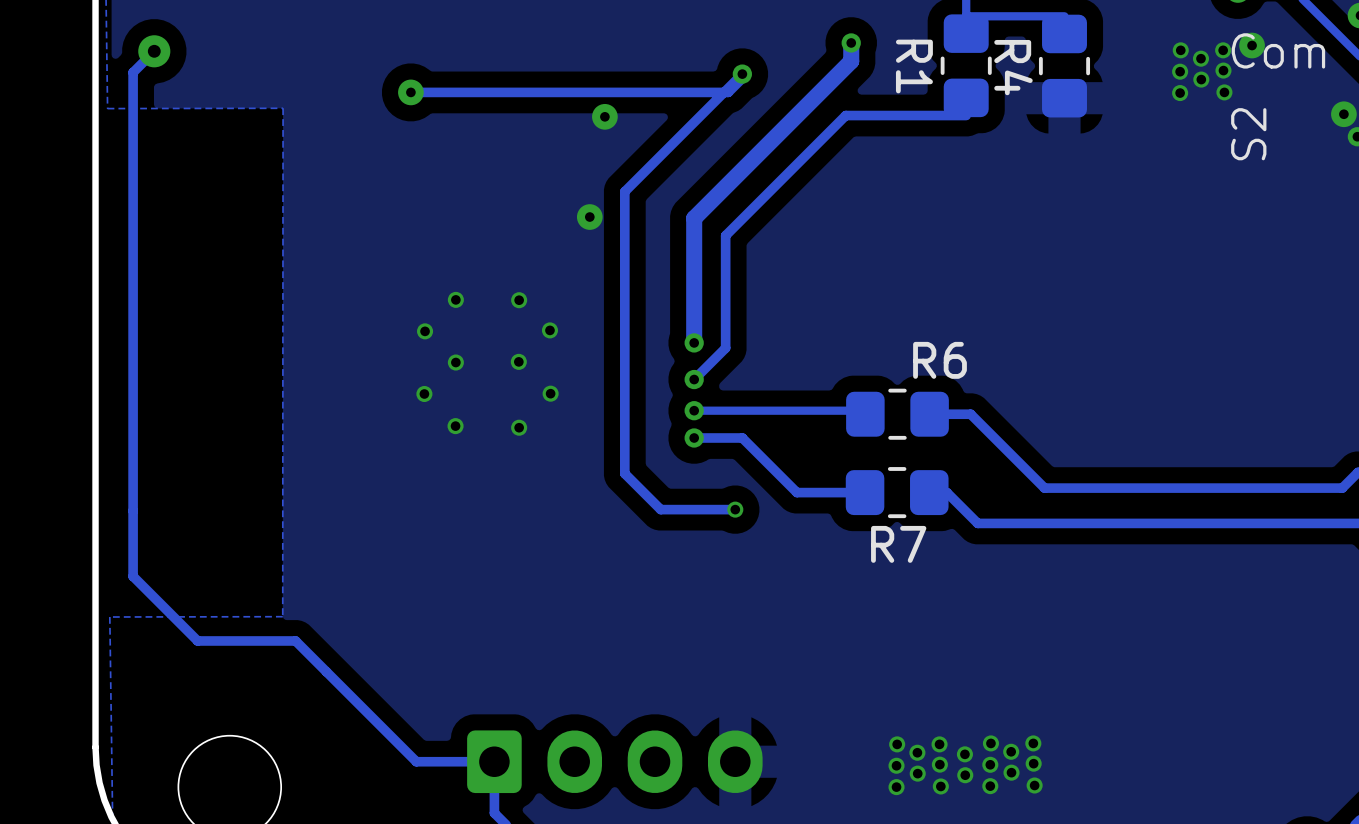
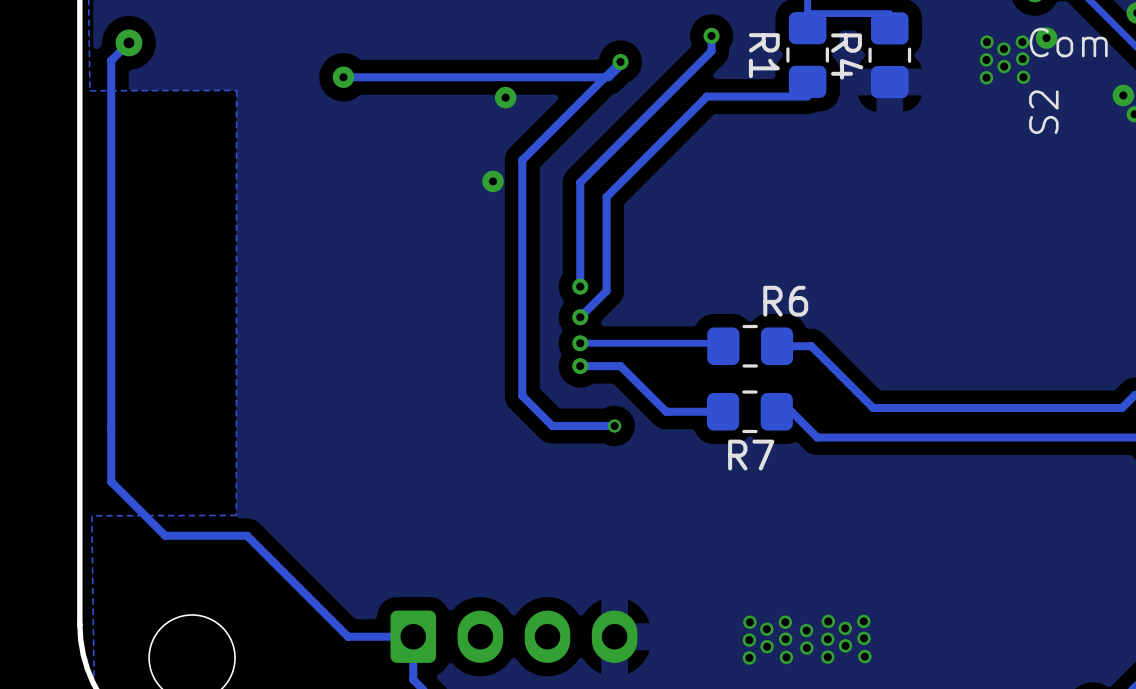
track width: thick (851, 42) (851, 61) (694, 218) (694, 342) -> thin (711, 35) (711, 51) (580, 182) (580, 286)
via: (455, 299) -> none
via: (519, 300) -> none
via: (549, 330) -> none
via: (425, 331) -> none
via: (518, 361) -> none
via: (455, 362) -> none
via: (424, 393) -> none
via: (550, 393) -> none
via: (455, 426) -> none
via: (519, 427) -> none

